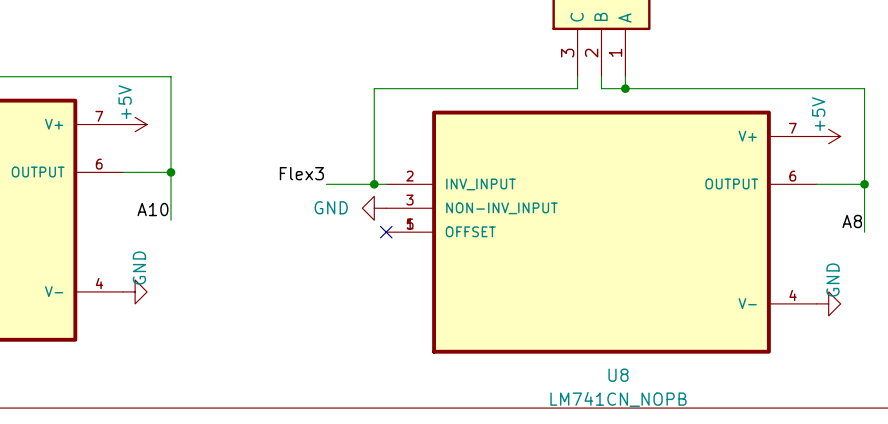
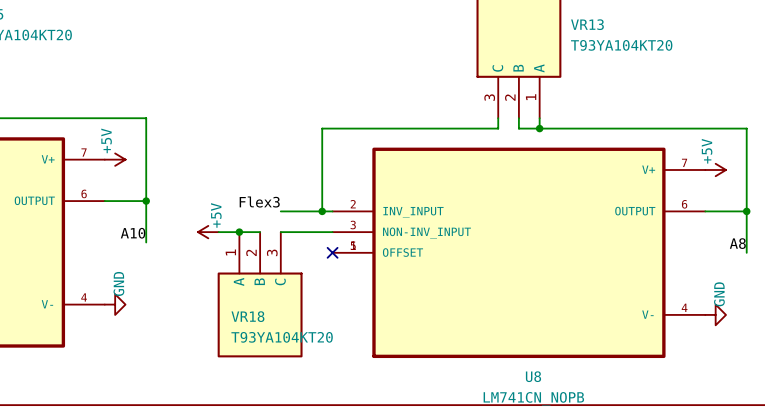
power symbol: none -> +5V (208, 232)
wire: none -> (218, 232) (260, 232)
junction: none -> (239, 232)
wire: none -> (280, 232) (332, 232)
power symbol: GND (374, 208) -> none
VR18: none -> T93YA104KT20 (260, 294)

